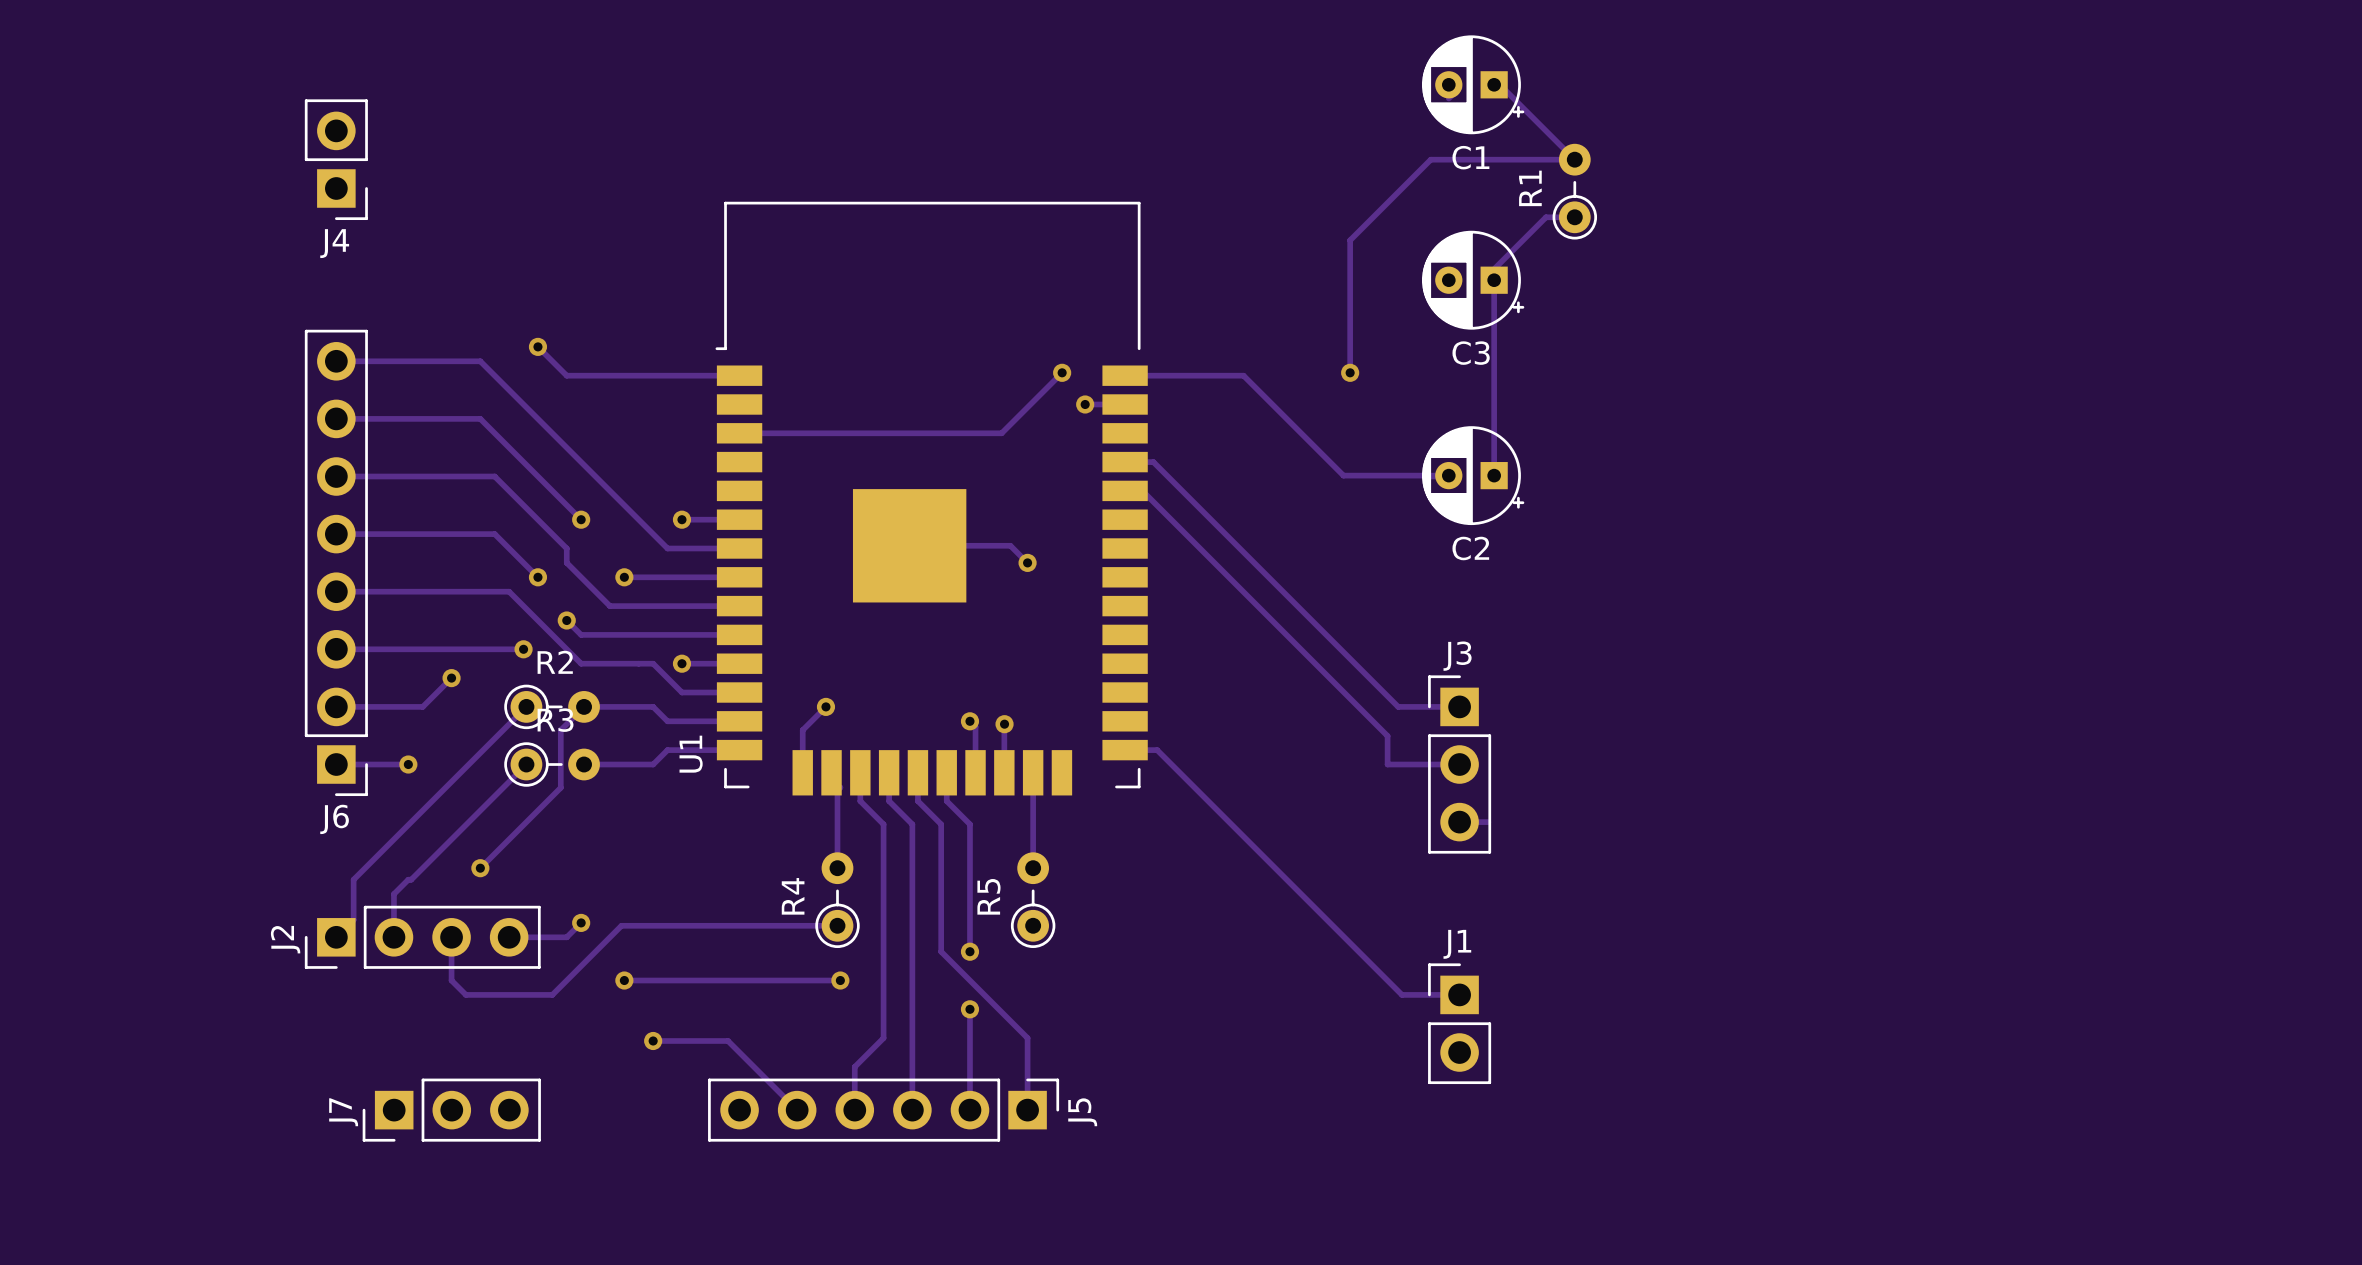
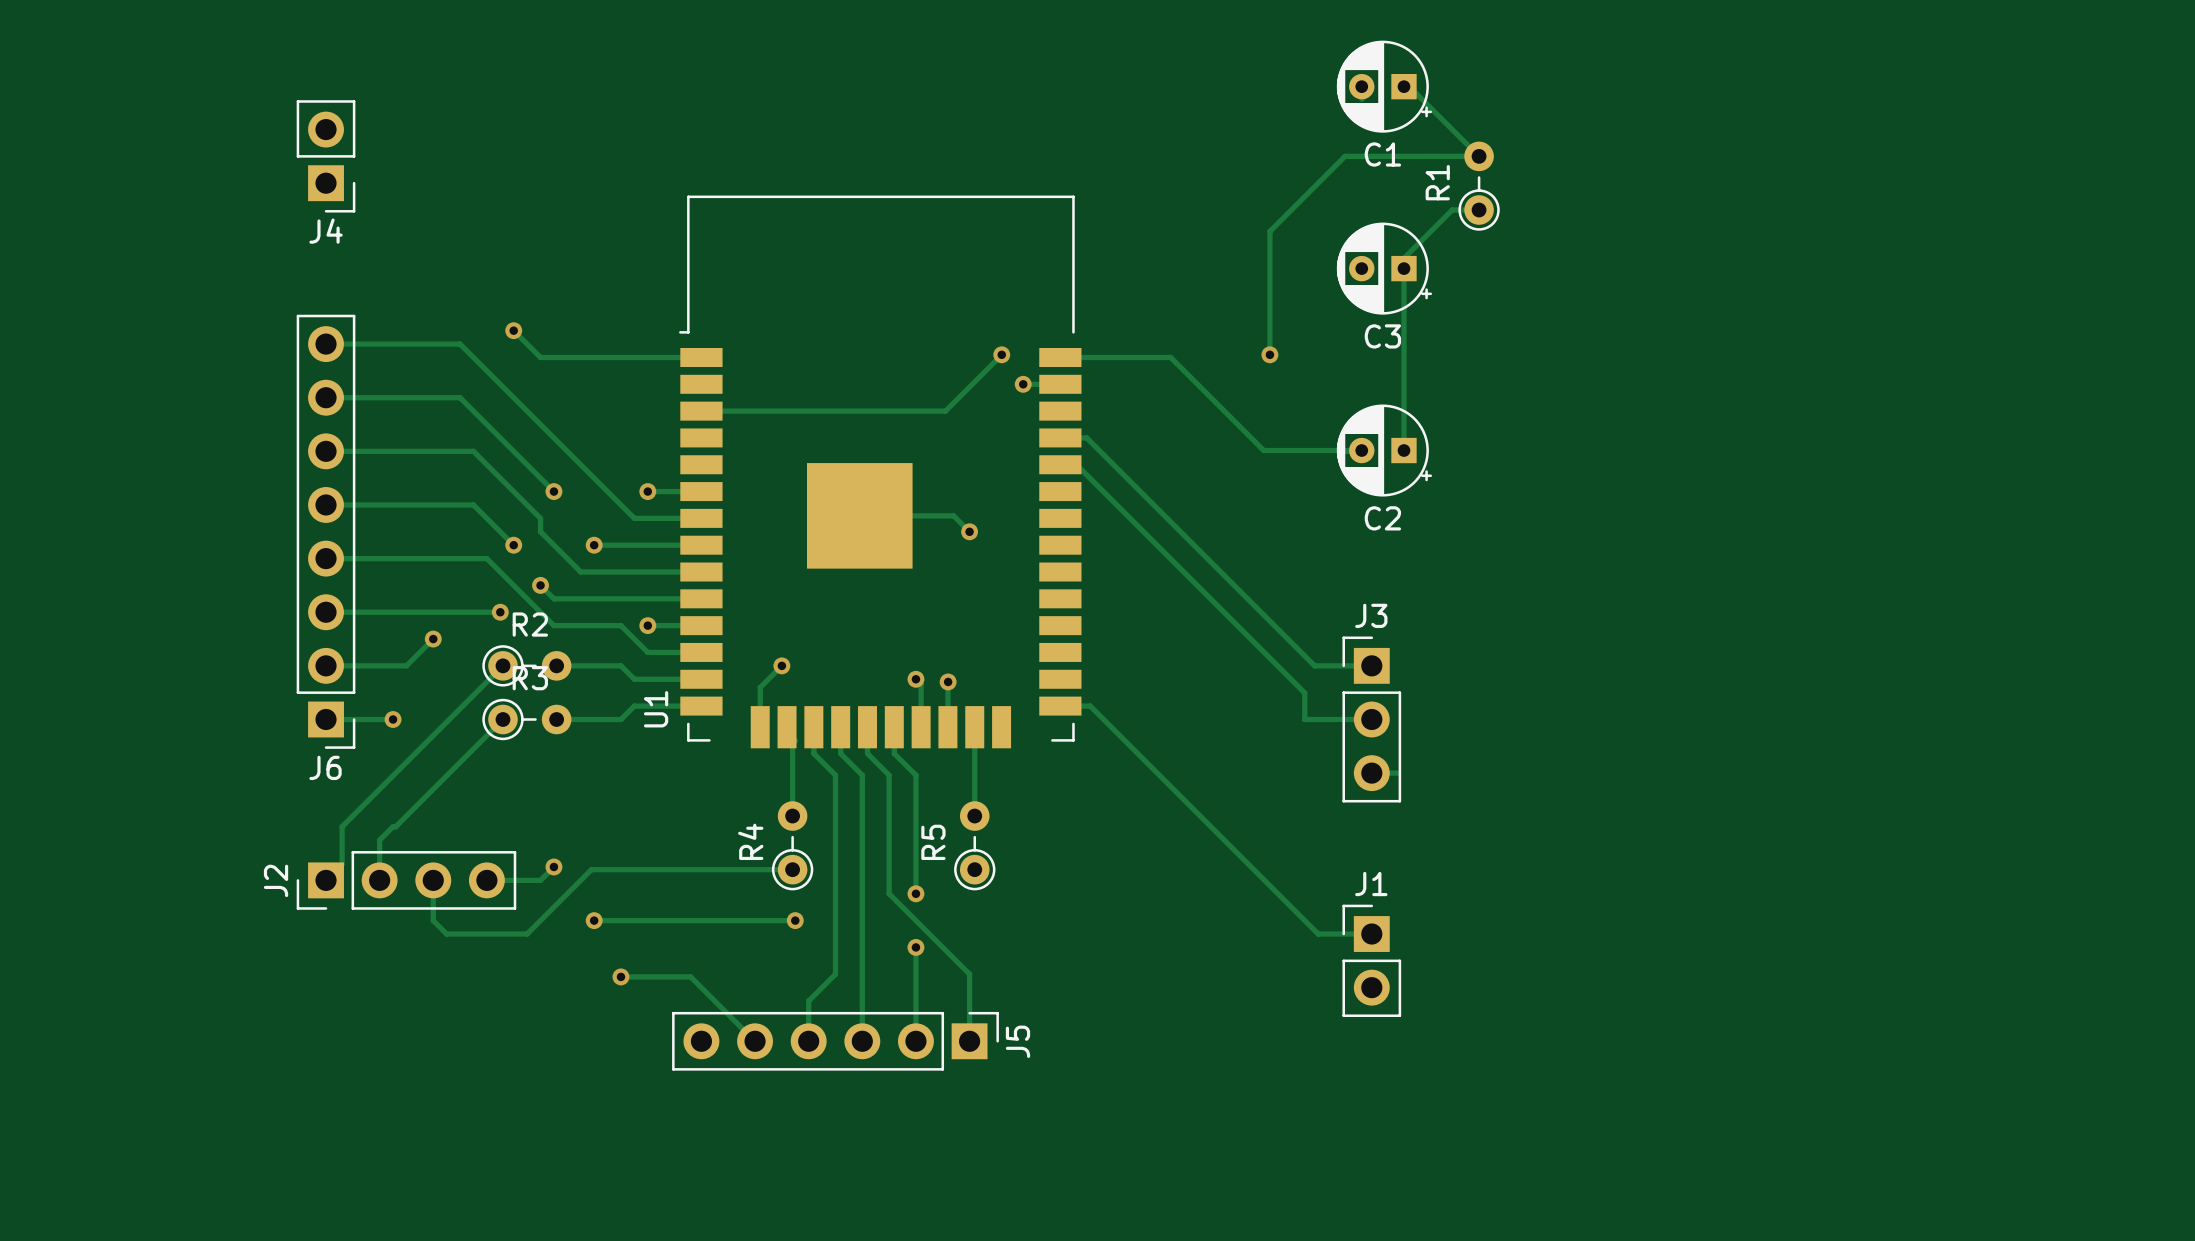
track: (584, 706) (560, 730) (560, 787) (480, 868) -> none
via: (480, 868) -> none
J7: (451, 1110) -> none

